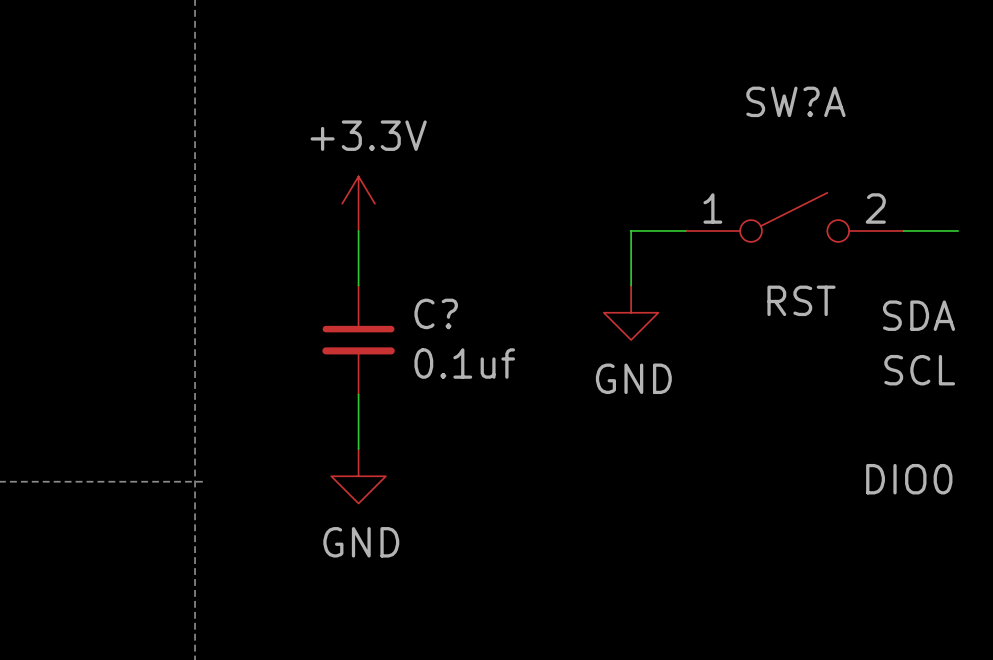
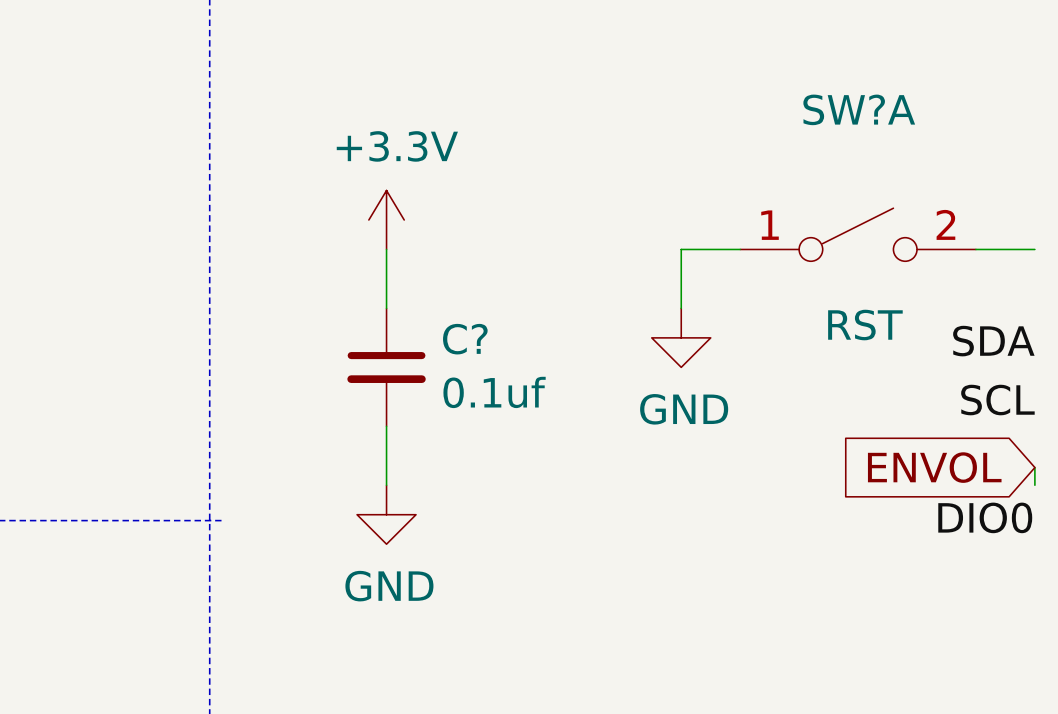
global label: none -> ENVOL (934, 467)
wire: none -> (1034, 467) (1034, 485)

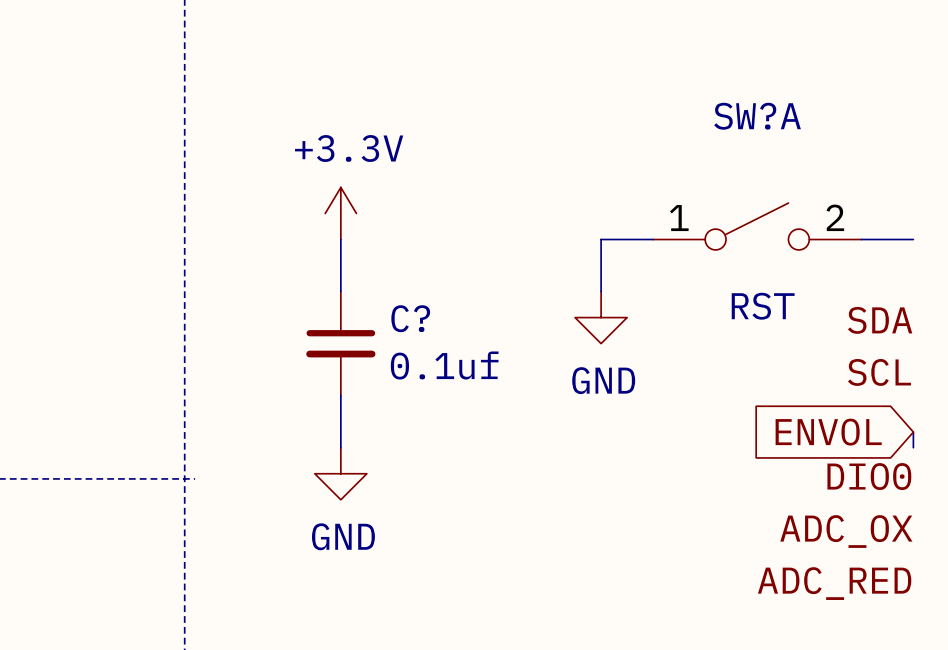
label: none -> ADC_OX (846, 531)
label: none -> ADC_RED (834, 583)

